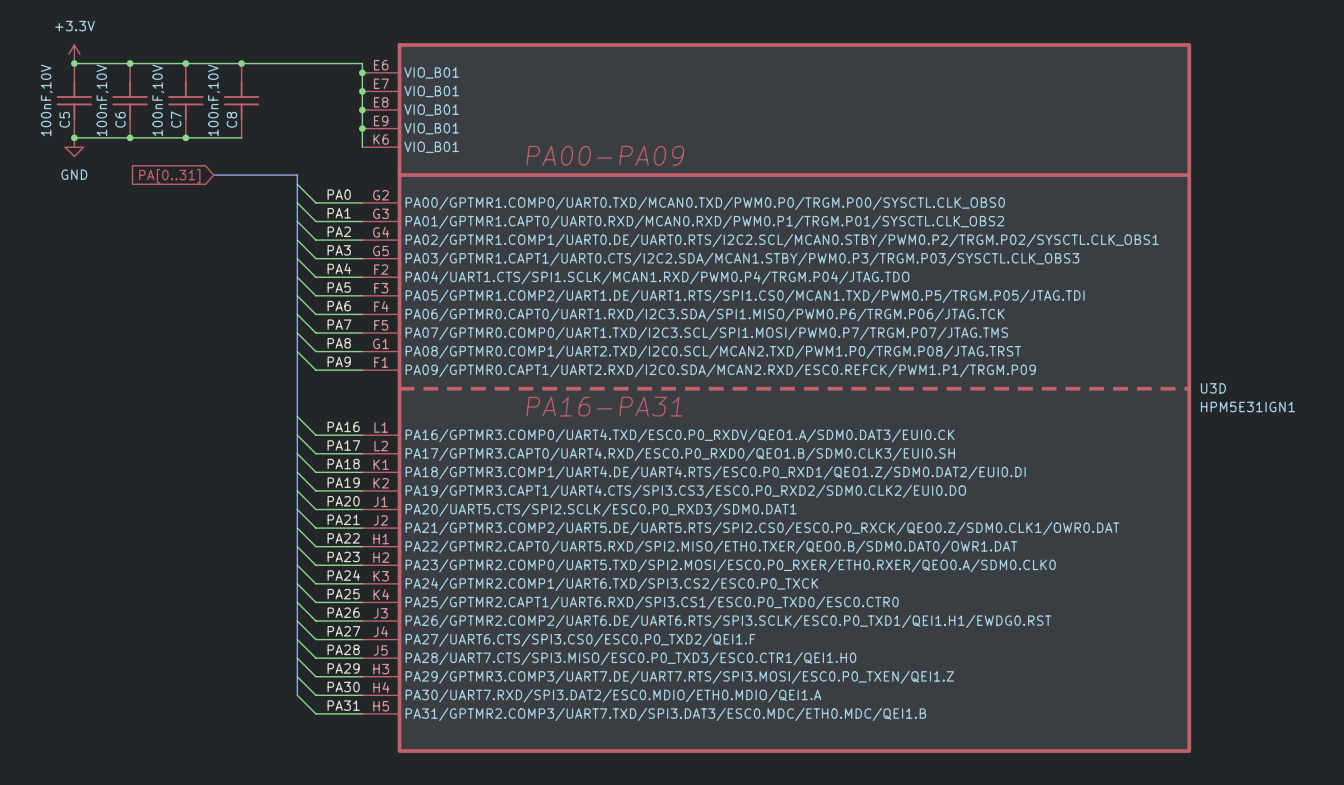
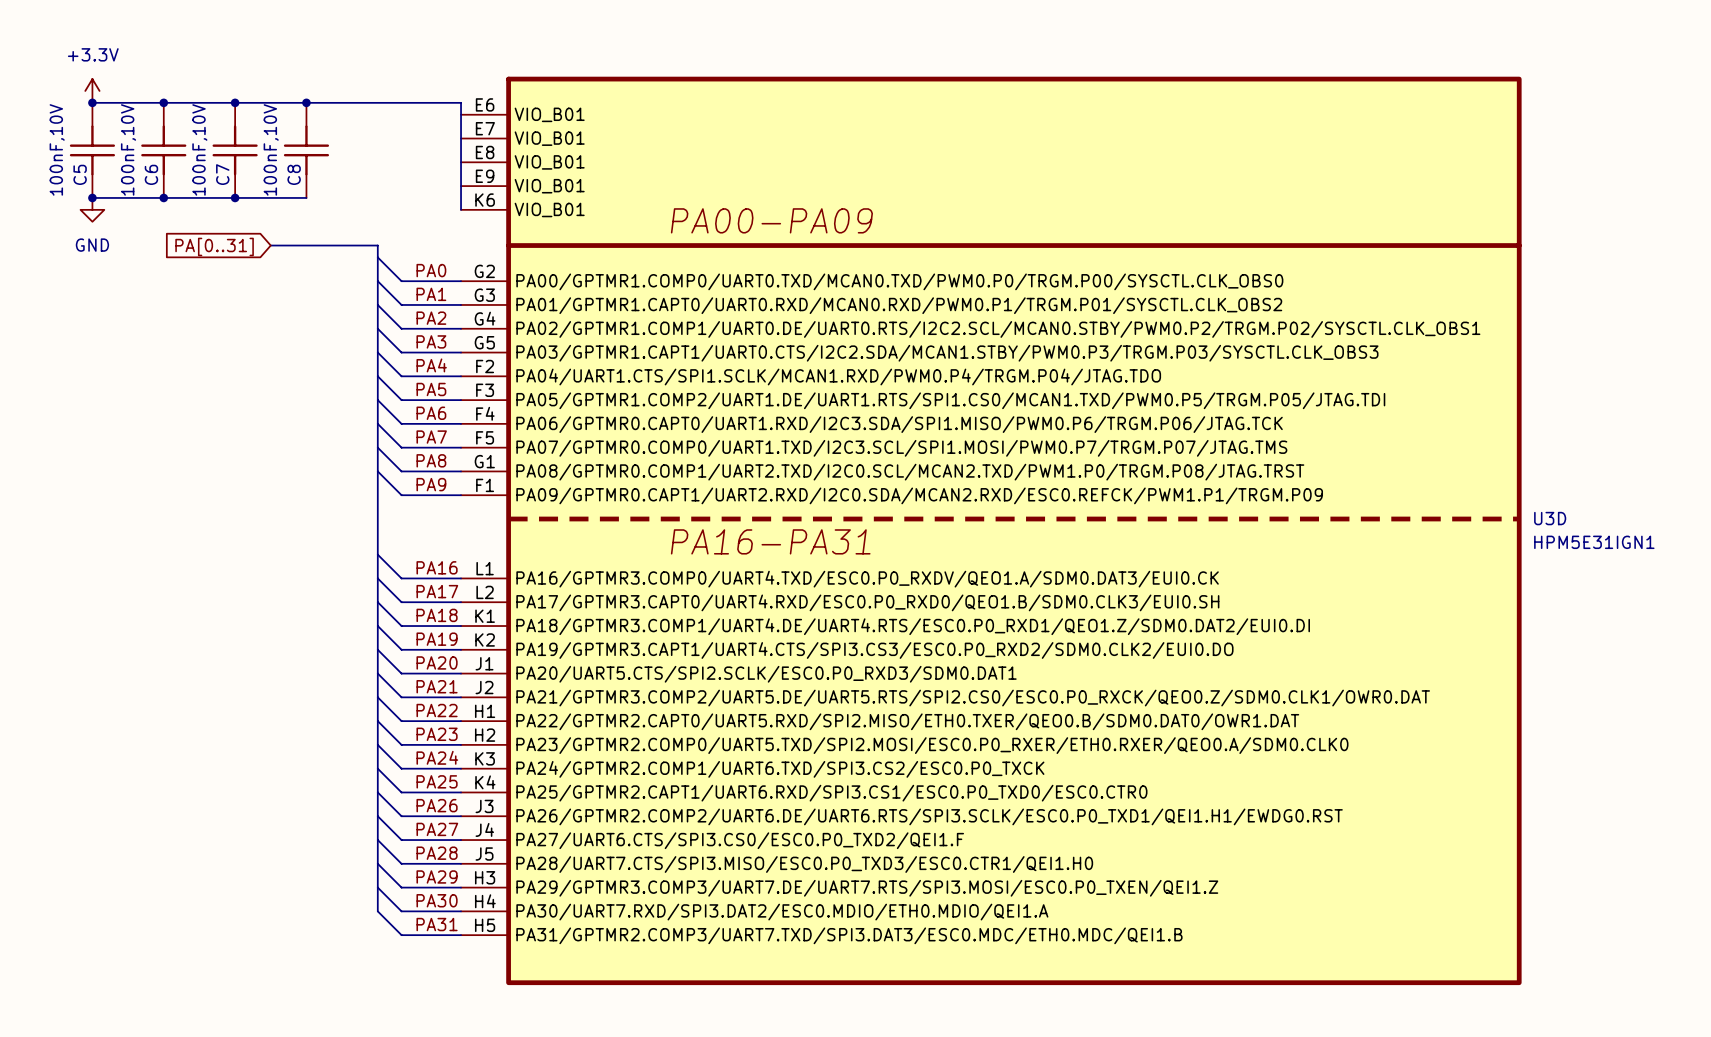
junction: (362, 72) -> none
junction: (362, 91) -> none
junction: (362, 110) -> none
junction: (362, 128) -> none

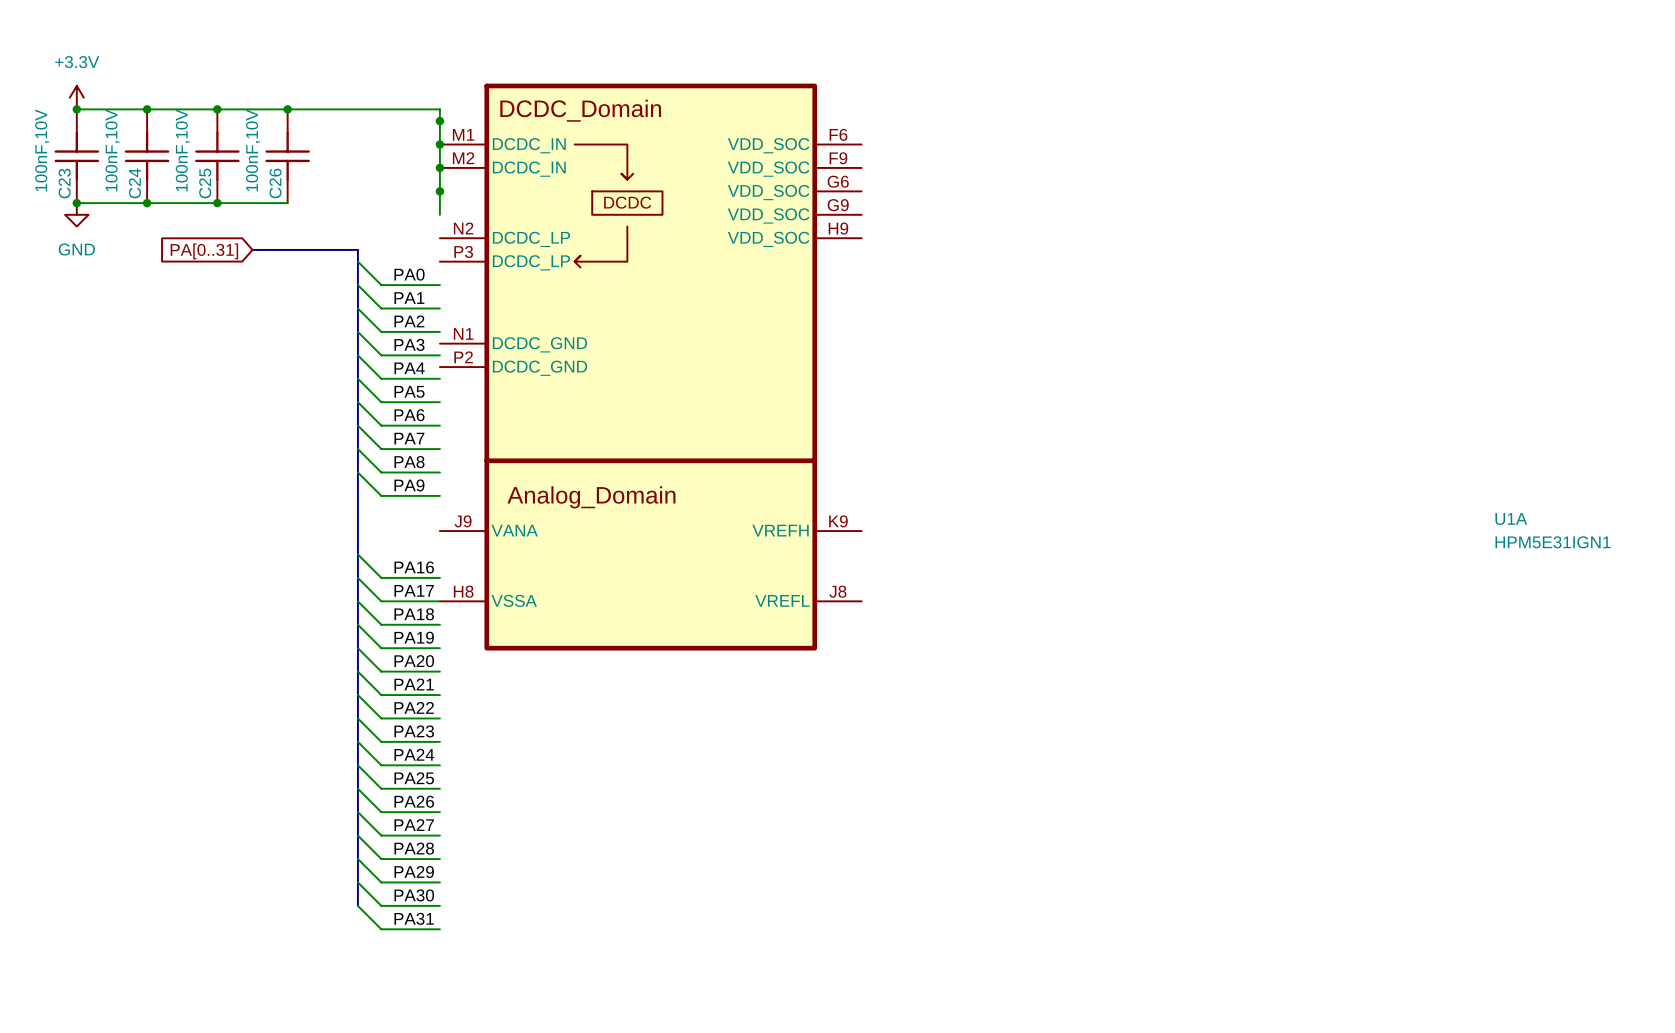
junction: none -> (439, 121)
junction: none -> (439, 144)
junction: none -> (439, 167)
C5 name: C5 (80, 174) -> C23 (64, 183)
C6 name: C6 (151, 174) -> C24 (134, 183)
C7 name: C7 (222, 174) -> C25 (205, 183)
C8 name: C8 (294, 174) -> C26 (275, 183)
junction: none -> (439, 191)
U1A: none -> HPM5E31IGN1 (650, 367)
U3D: HPM5E31IGN1 (991, 530) -> none

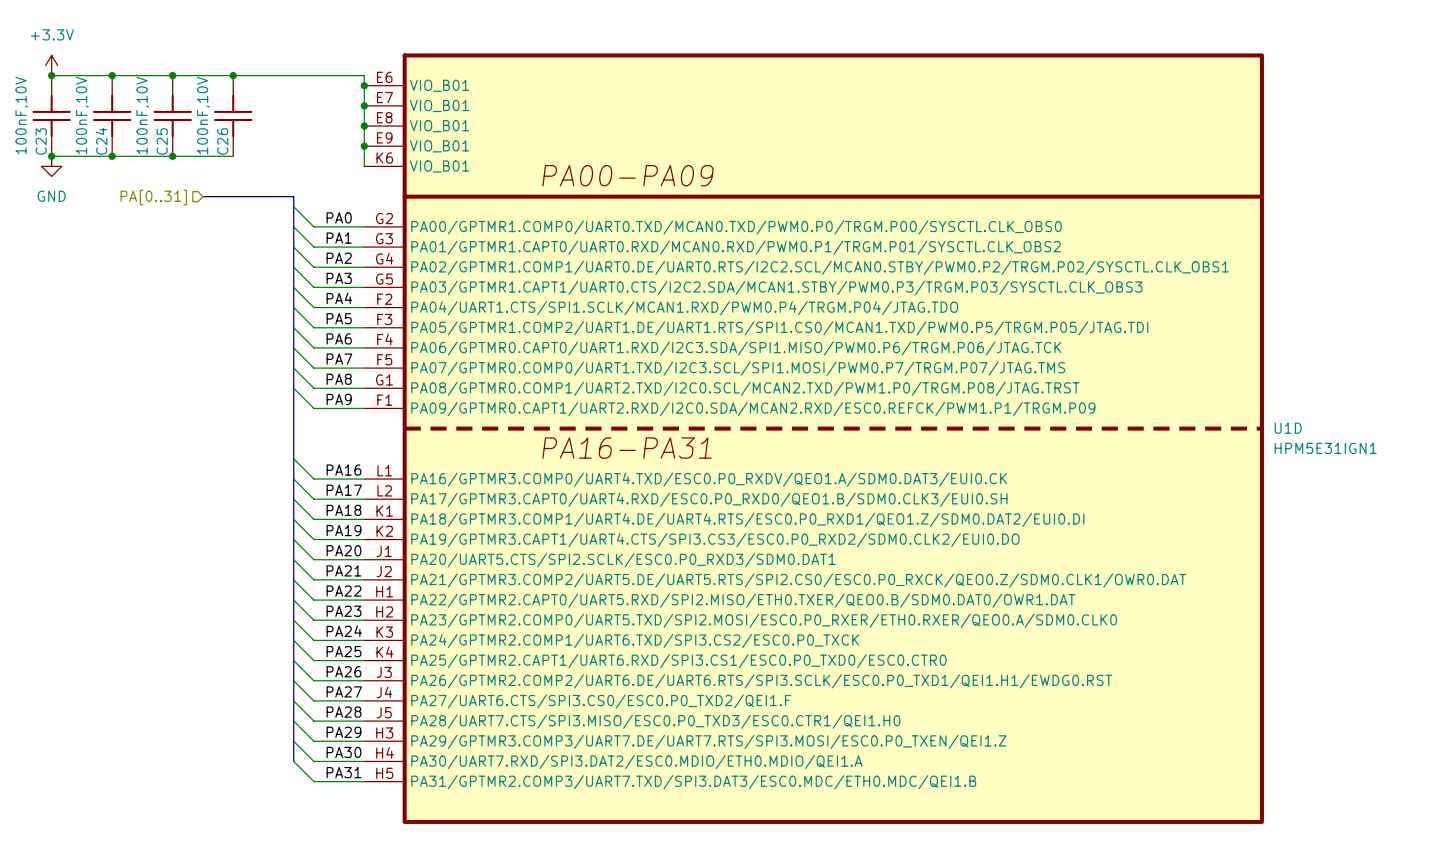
hierarchical label: none -> PA[0..31] (153, 197)
global label: PA[0..31] (204, 251) -> none
U1A: HPM5E31IGN1 (650, 367) -> none
U1D: none -> HPM5E31IGN1 (814, 438)

